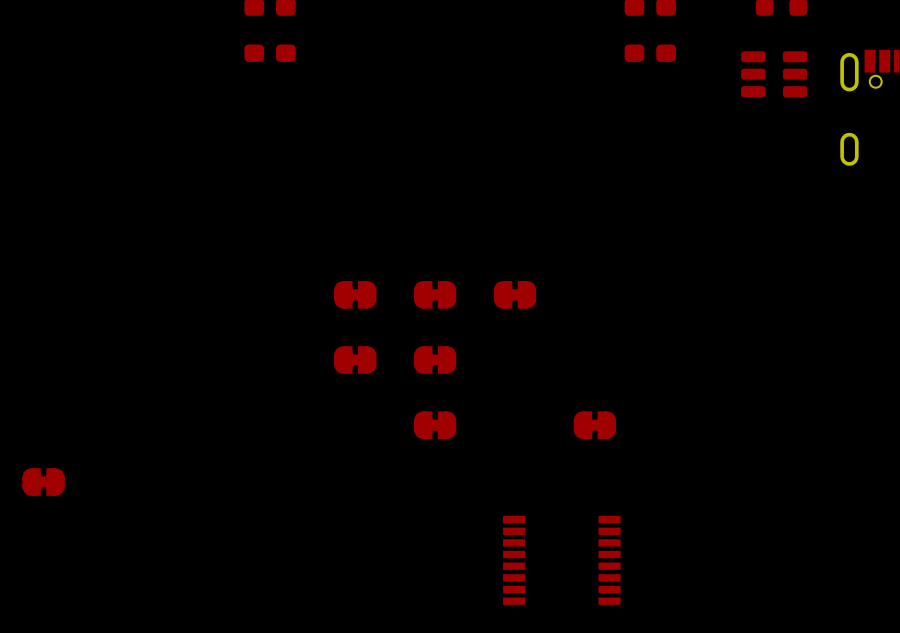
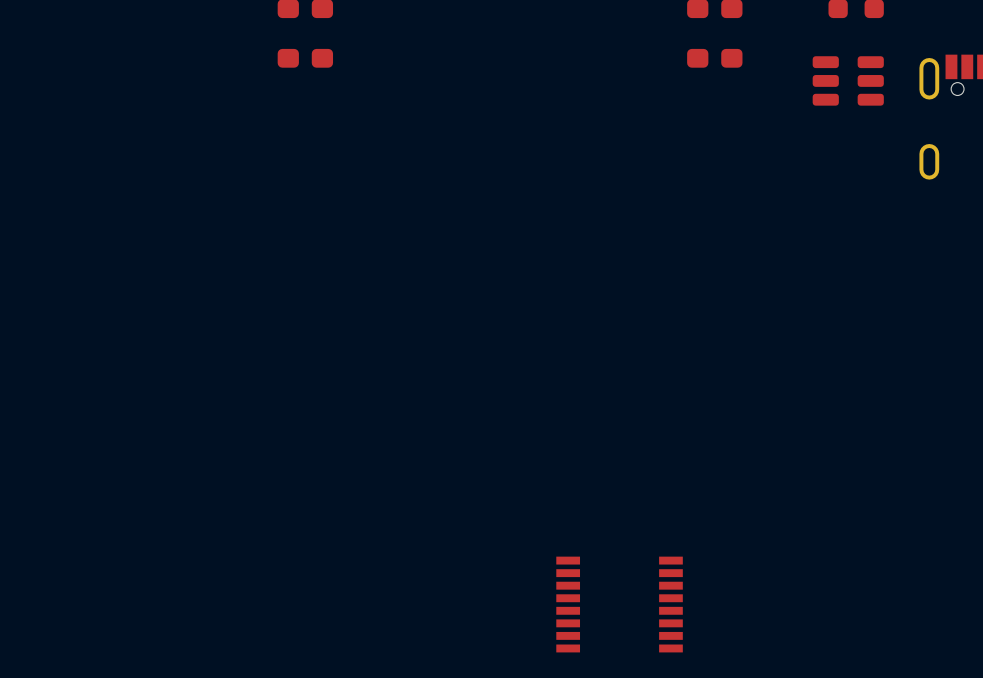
part: (355, 294) -> none
part: (435, 294) -> none
part: (515, 294) -> none
part: (355, 360) -> none
part: (435, 360) -> none
part: (435, 425) -> none
part: (594, 425) -> none
part: (43, 482) -> none

